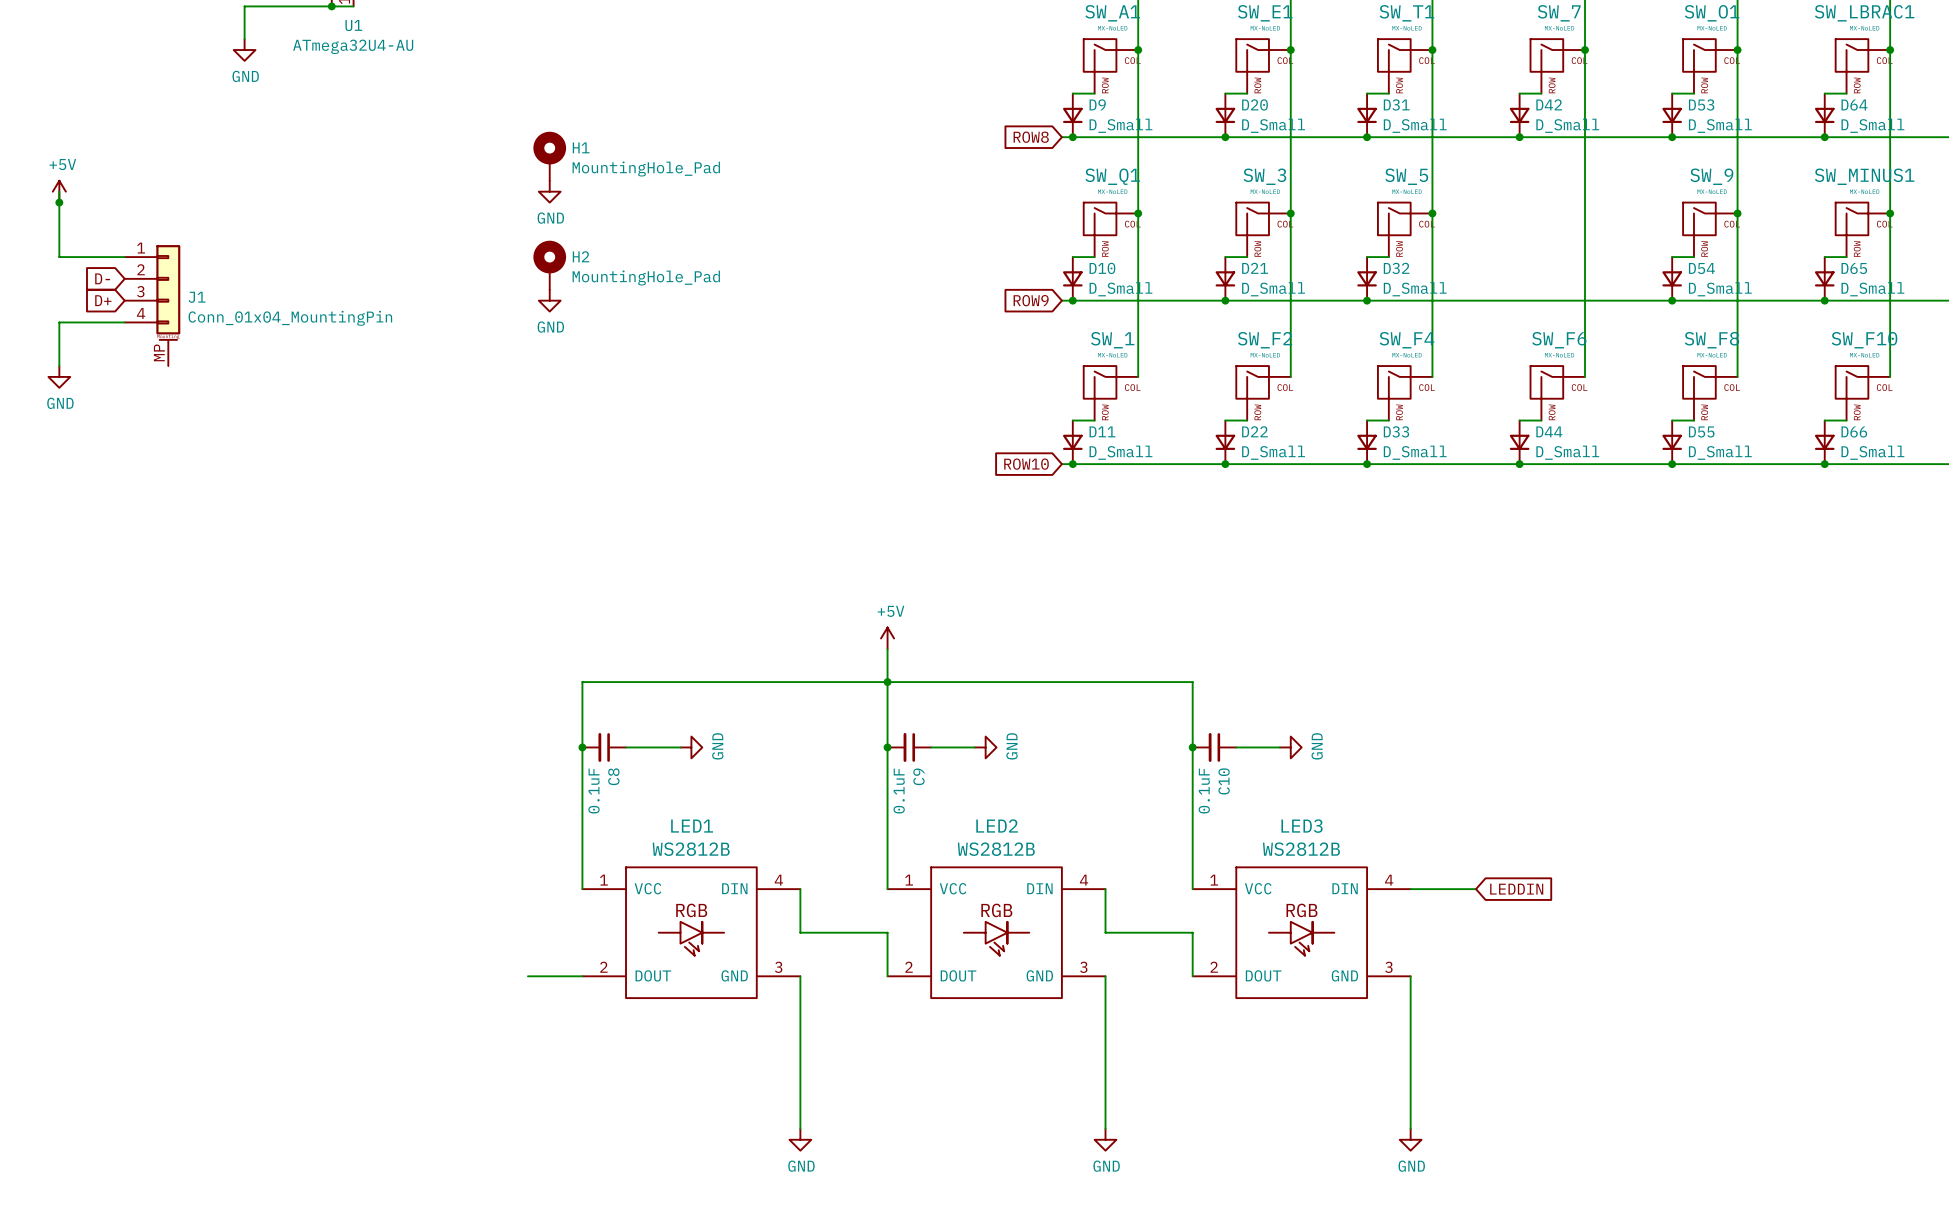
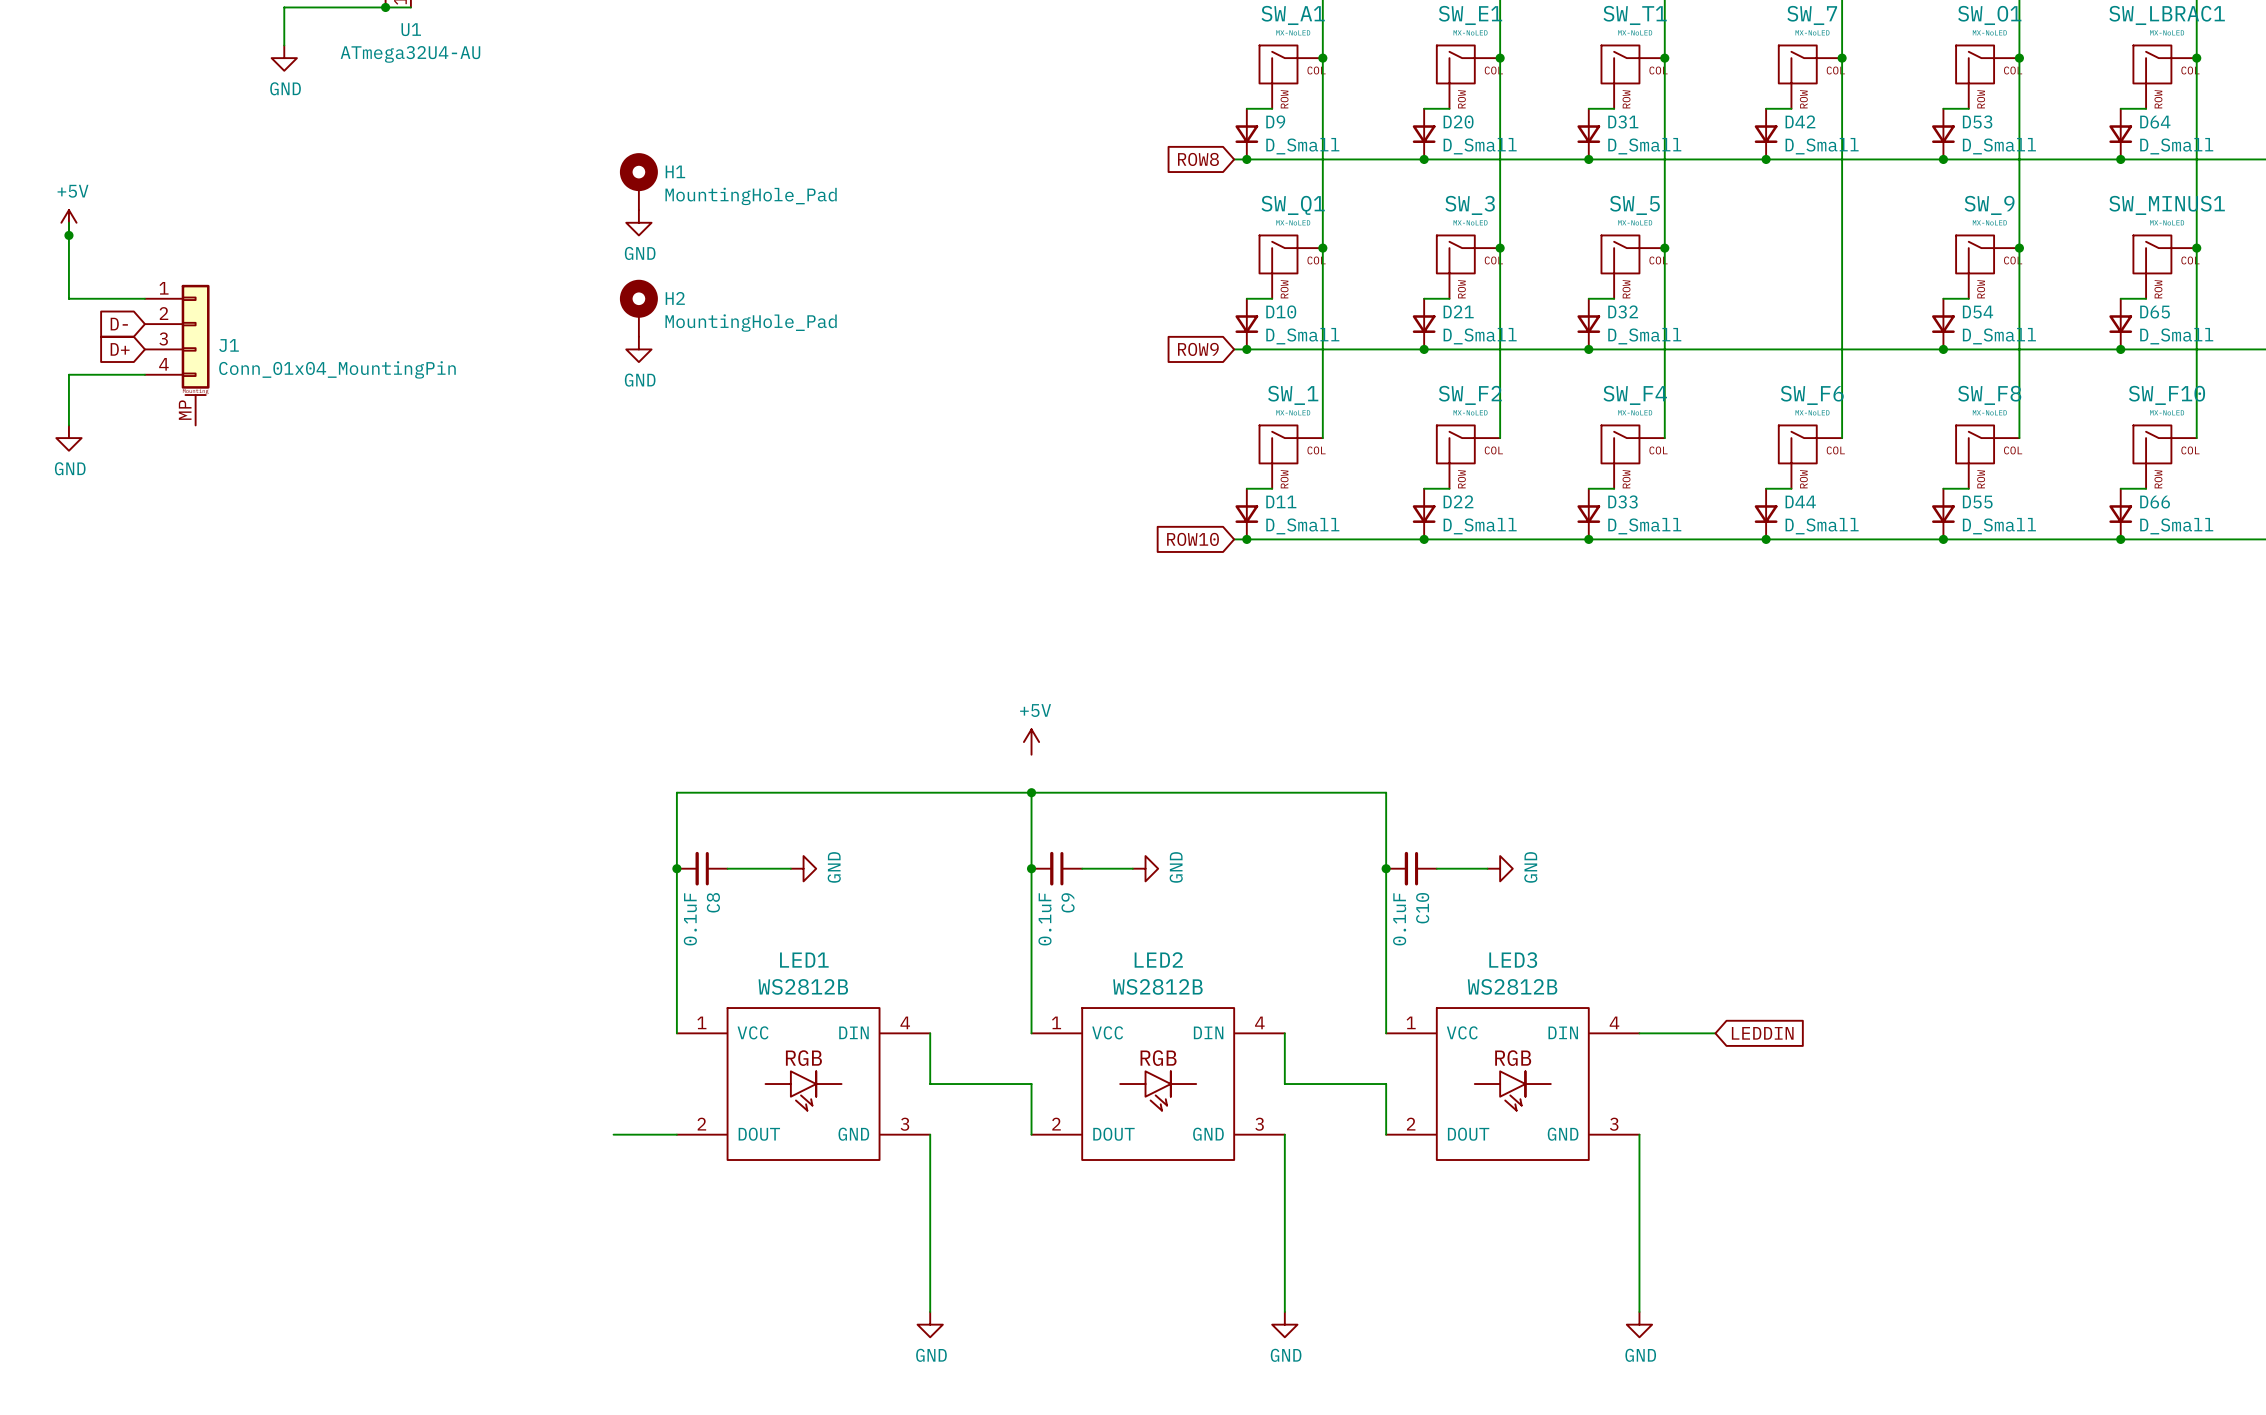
wire: (887, 649) (887, 682) -> none

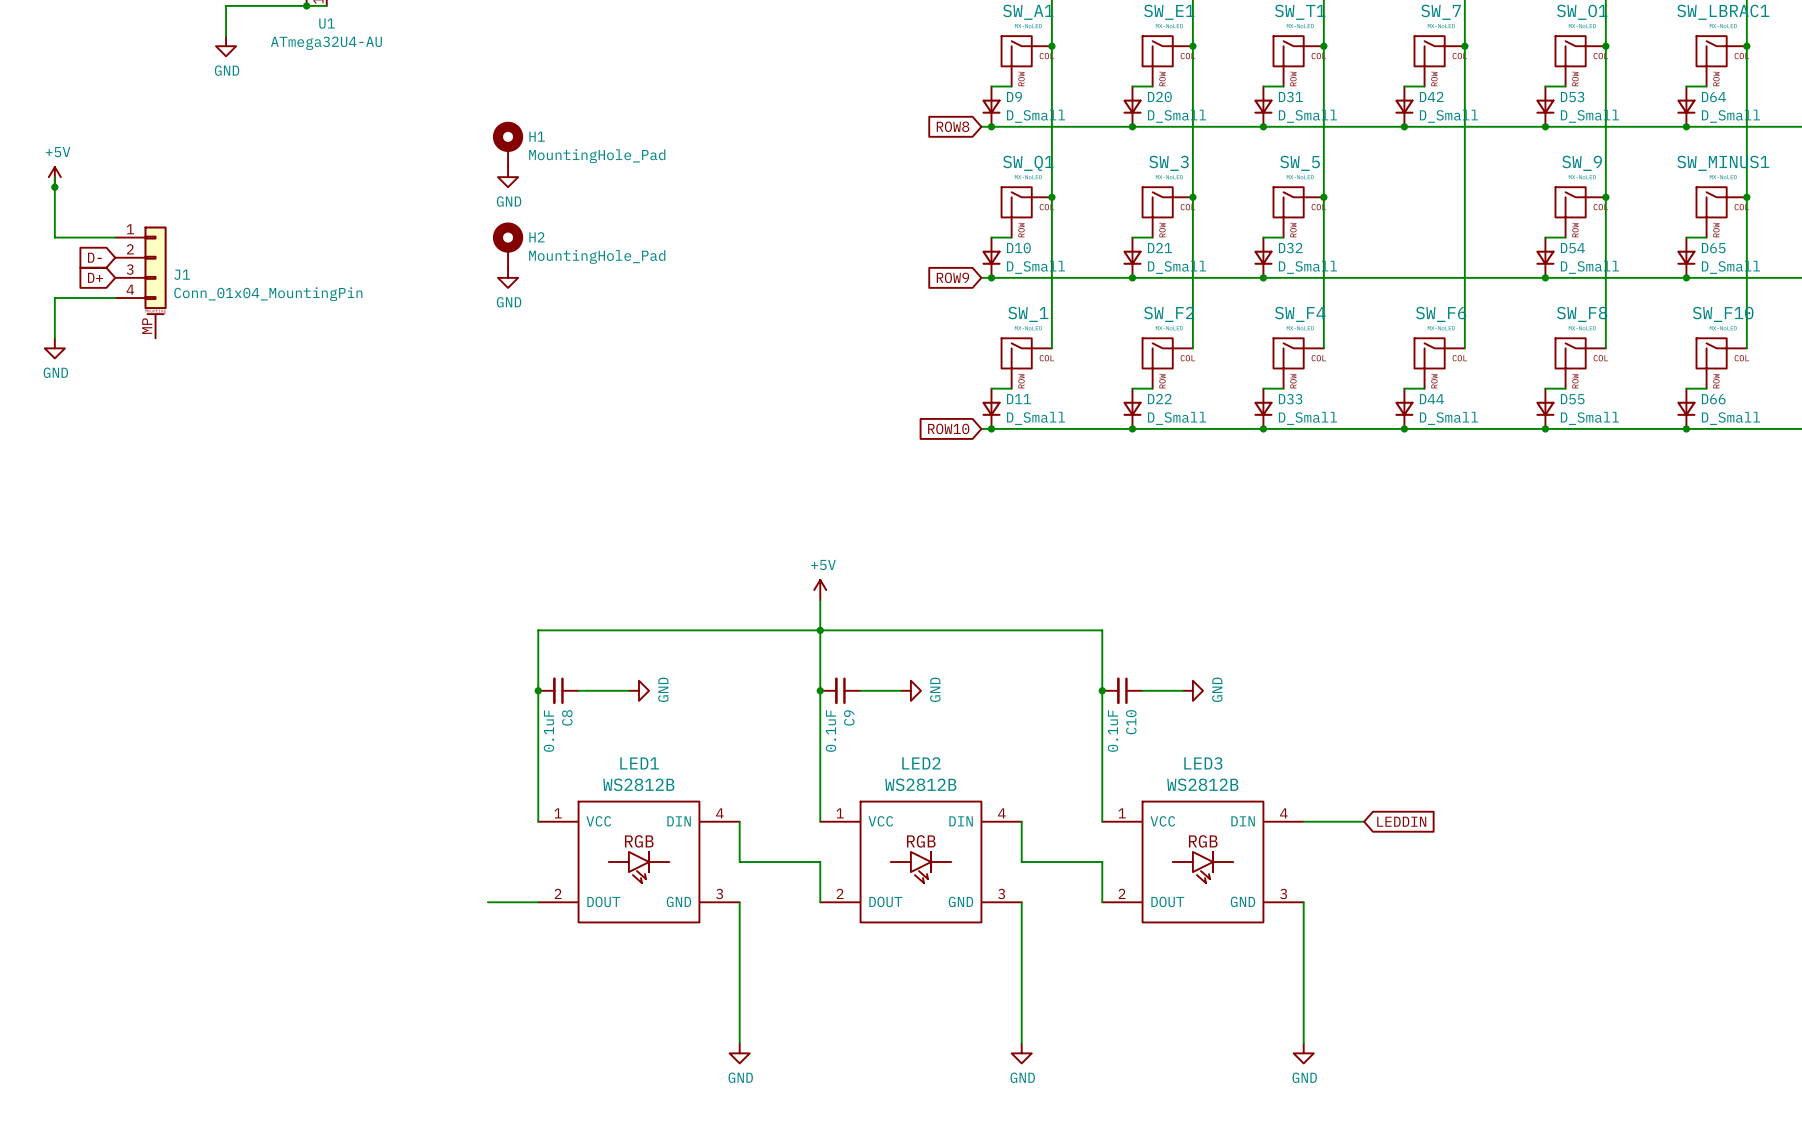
wire: none -> (820, 600) (820, 630)

